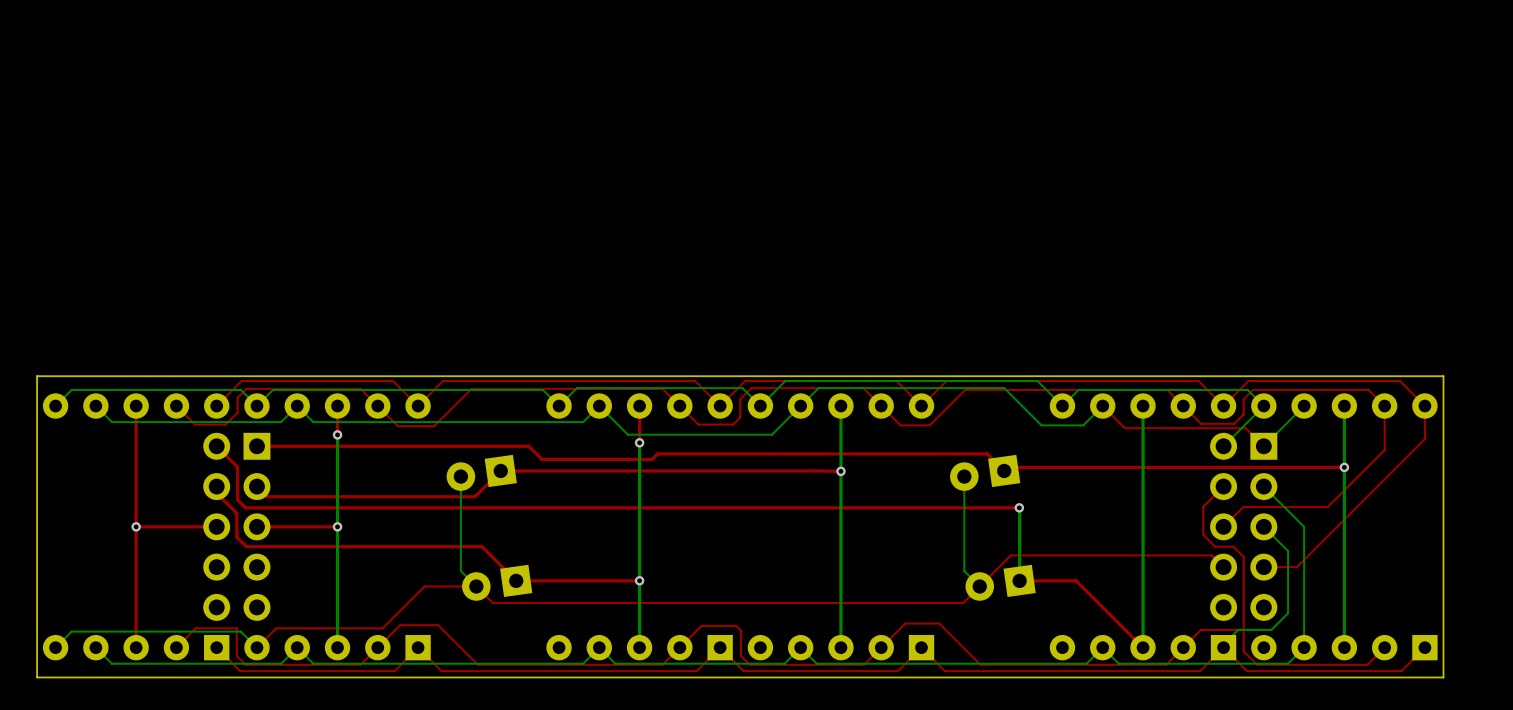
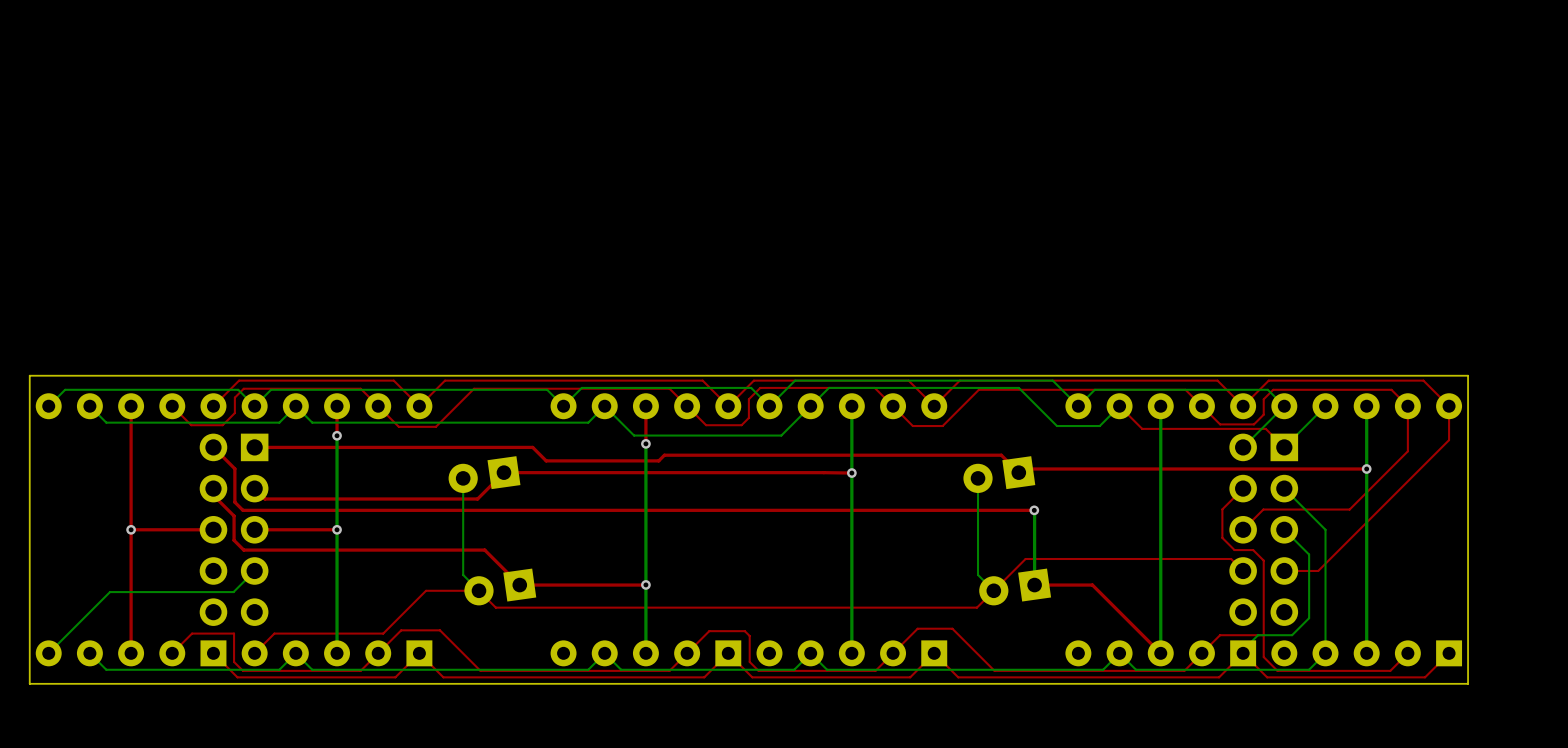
bottom track: (71, 631) (240, 631) (256, 647) -> (65, 636) (109, 592) (233, 592) (254, 570)

